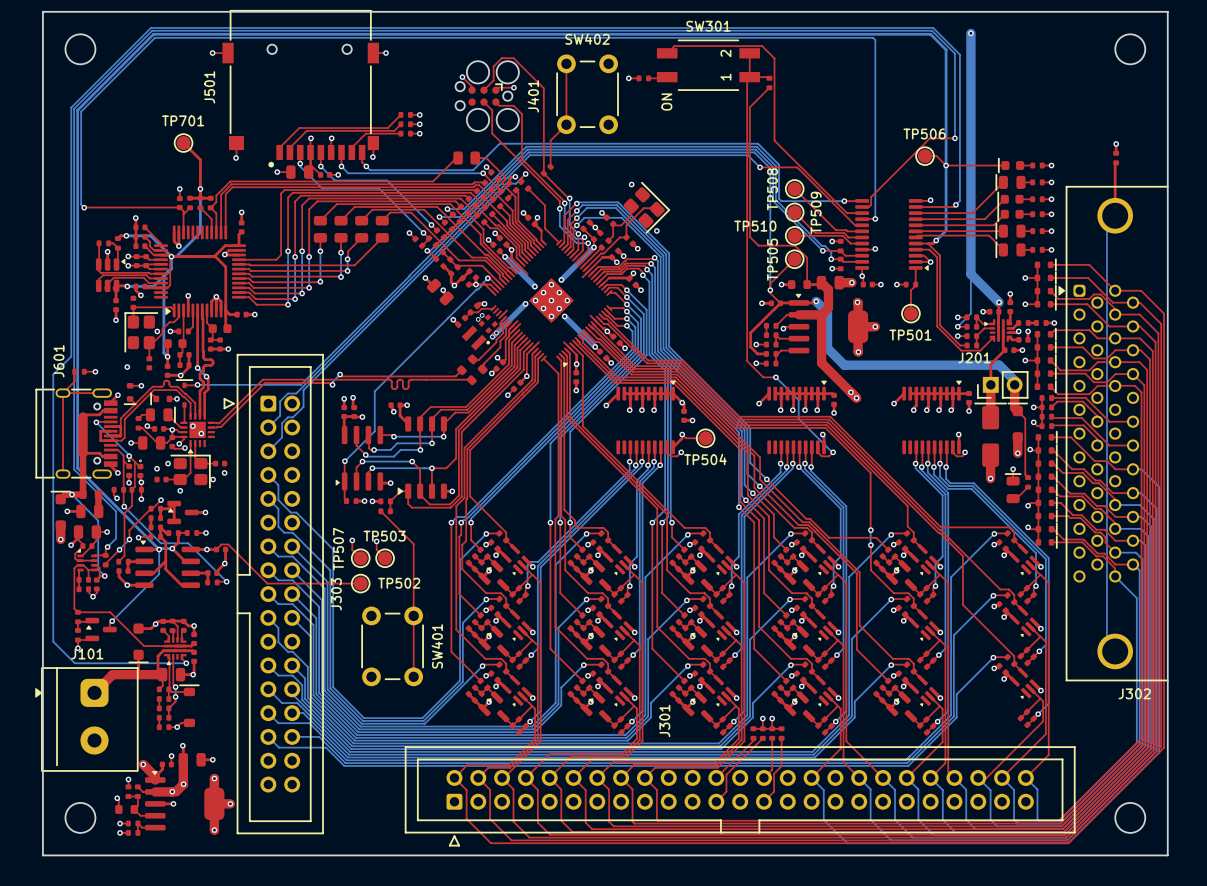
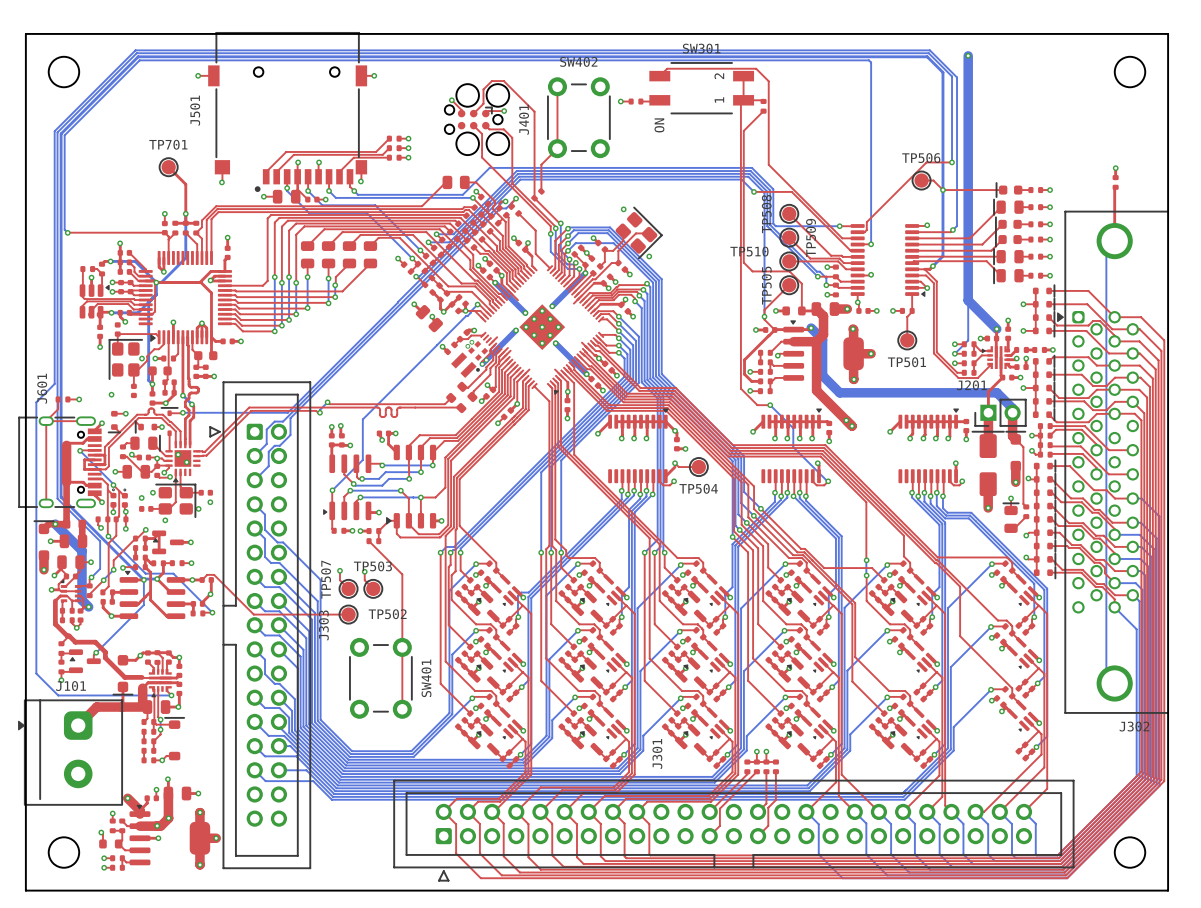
bottom track width: thin (72, 494) (98, 520) (98, 569) (104, 576) -> thick (55, 524) (81, 550) (81, 600) (88, 606)
top track: none -> (51, 589) (58, 589)
via: none -> (51, 589)
top track: (77, 565) (74, 568) (74, 608) (77, 612) (110, 612) (144, 646) (157, 646) -> (69, 635) (75, 642) (95, 642) (105, 652) (105, 657) (124, 677) (142, 678)
top track: none -> (60, 596) (55, 600) (55, 624) (69, 635)
top track: none -> (69, 635) (61, 643)
top track width: thin (158, 656) (158, 669) -> thick (142, 688) (142, 702)

